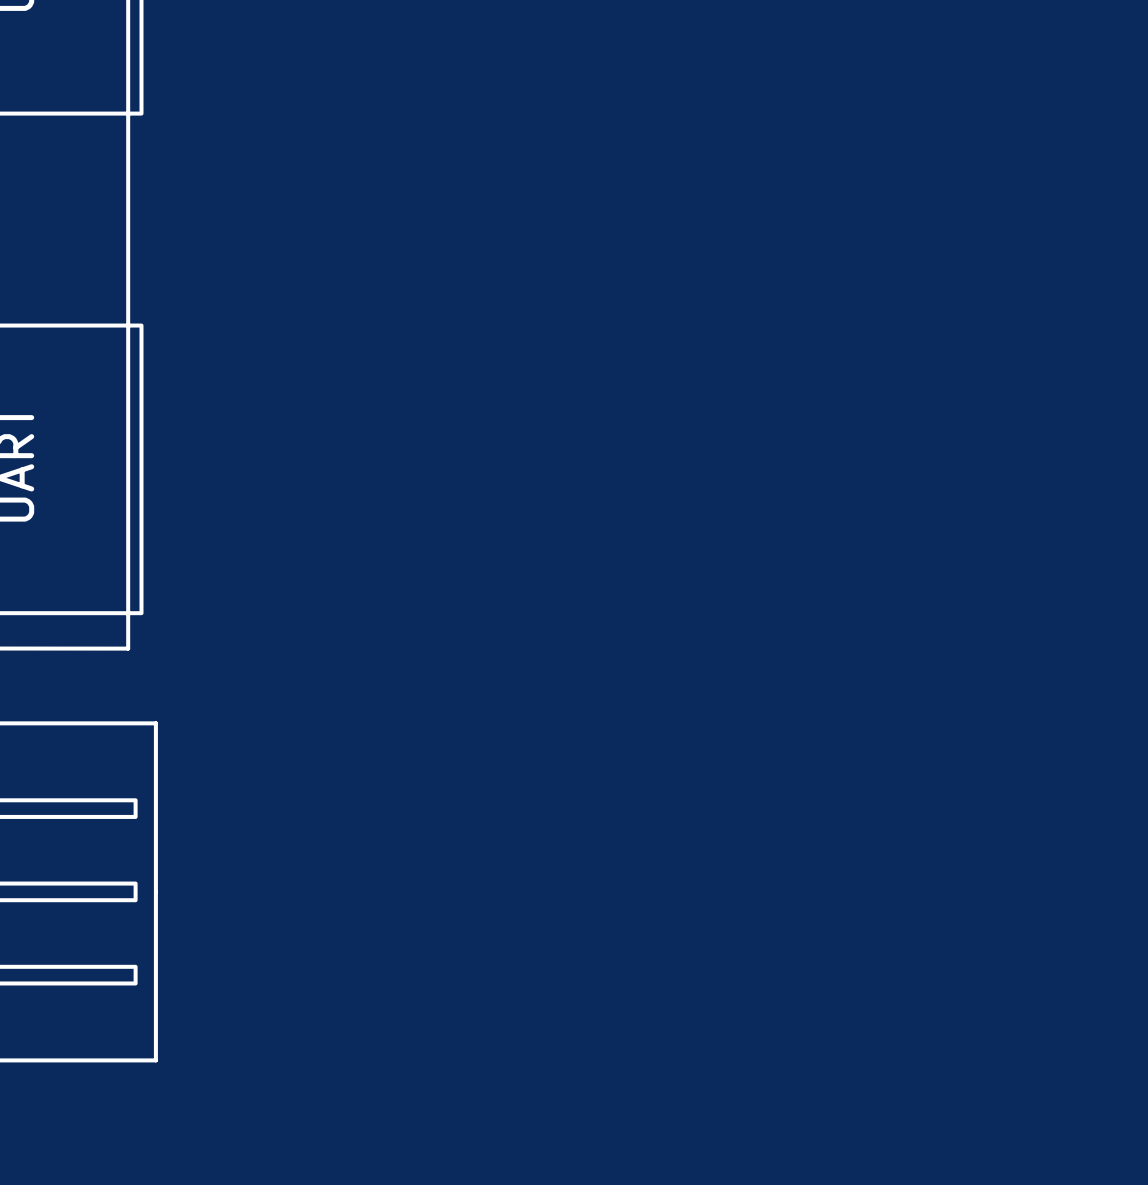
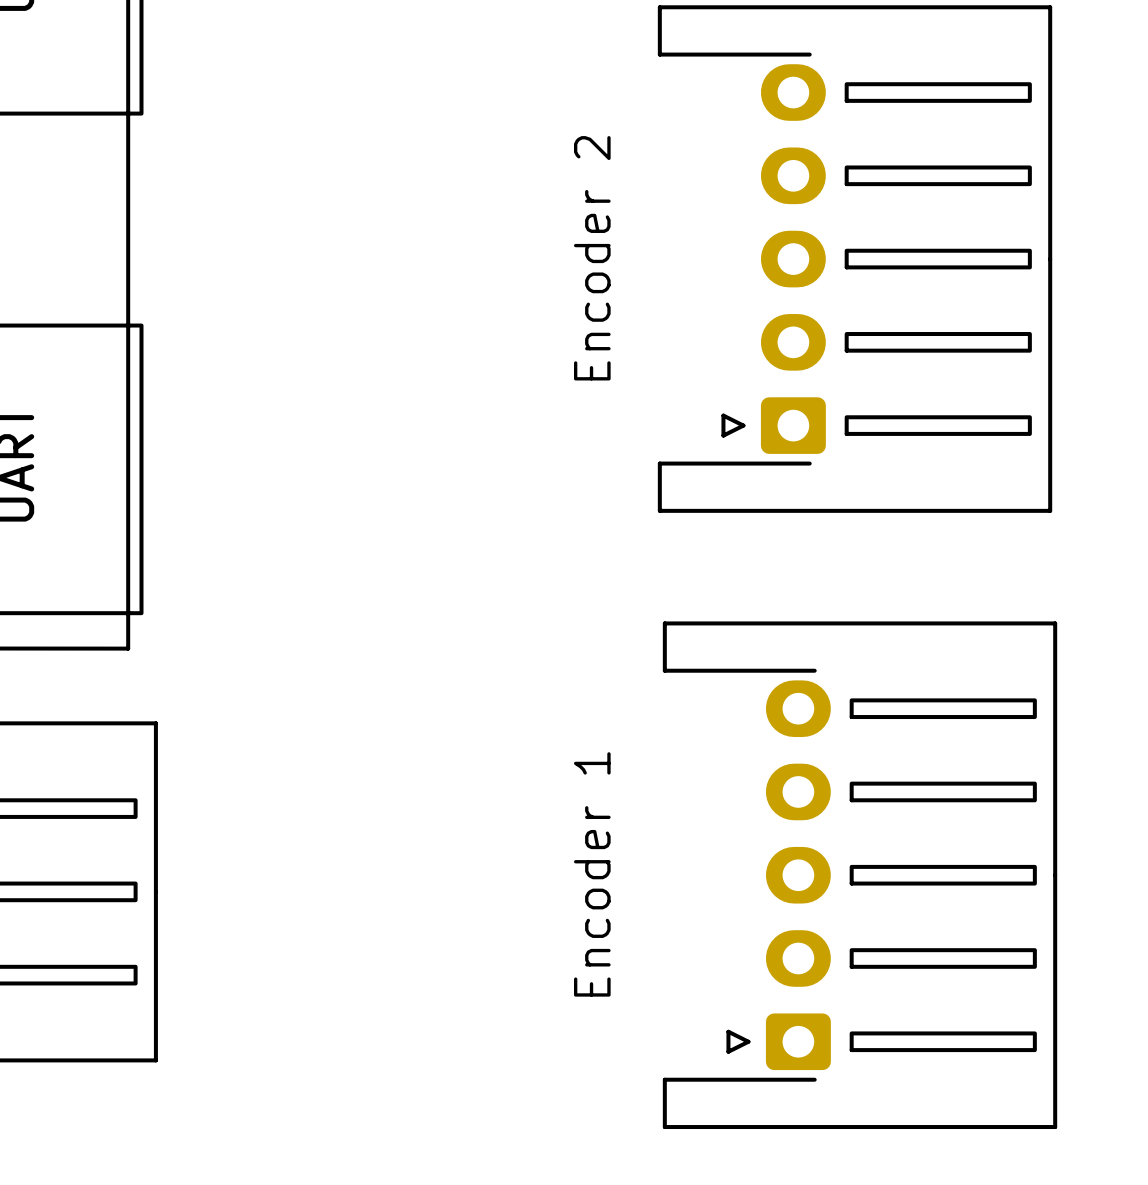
text: none -> Encoder 2 (592, 258)
part: none -> (855, 259)
text: none -> Encoder 1 (592, 874)
part: none -> (860, 875)

